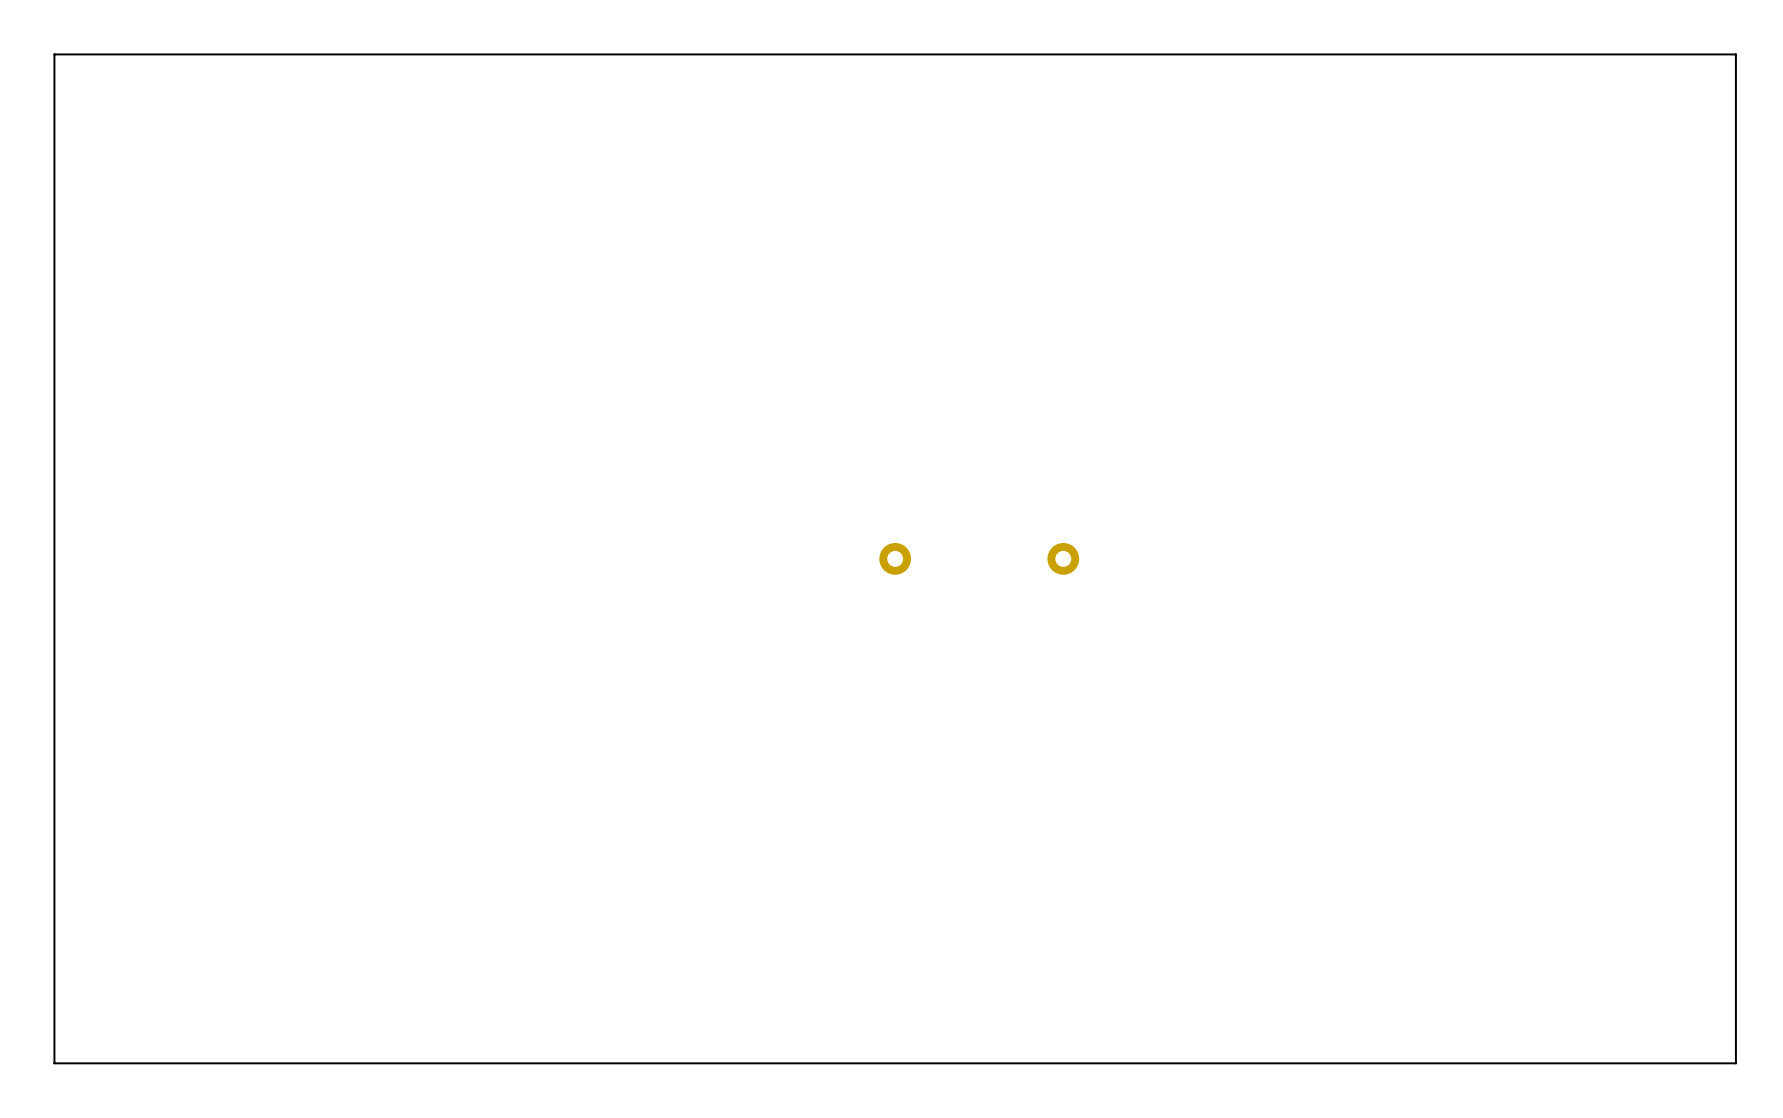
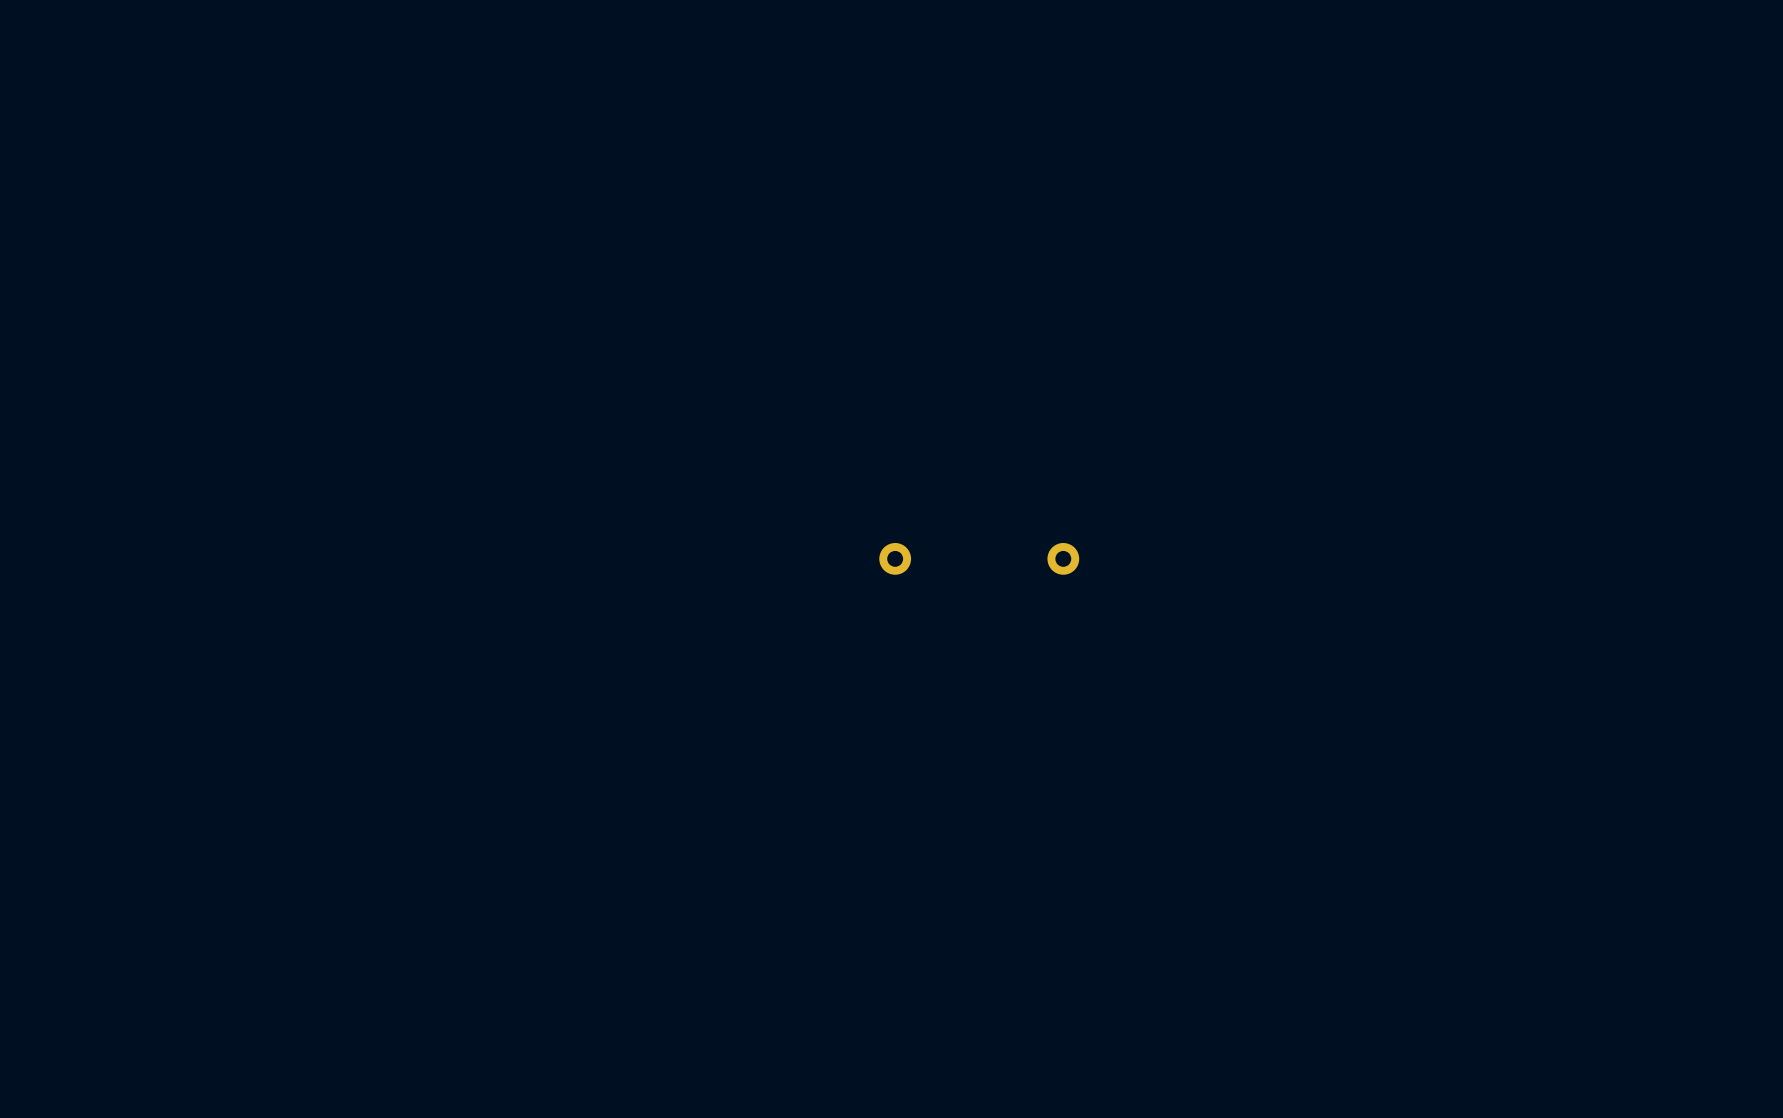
board edge: (1735, 54) (1735, 1063) (54, 1063) (54, 54) (1735, 54) -> none

